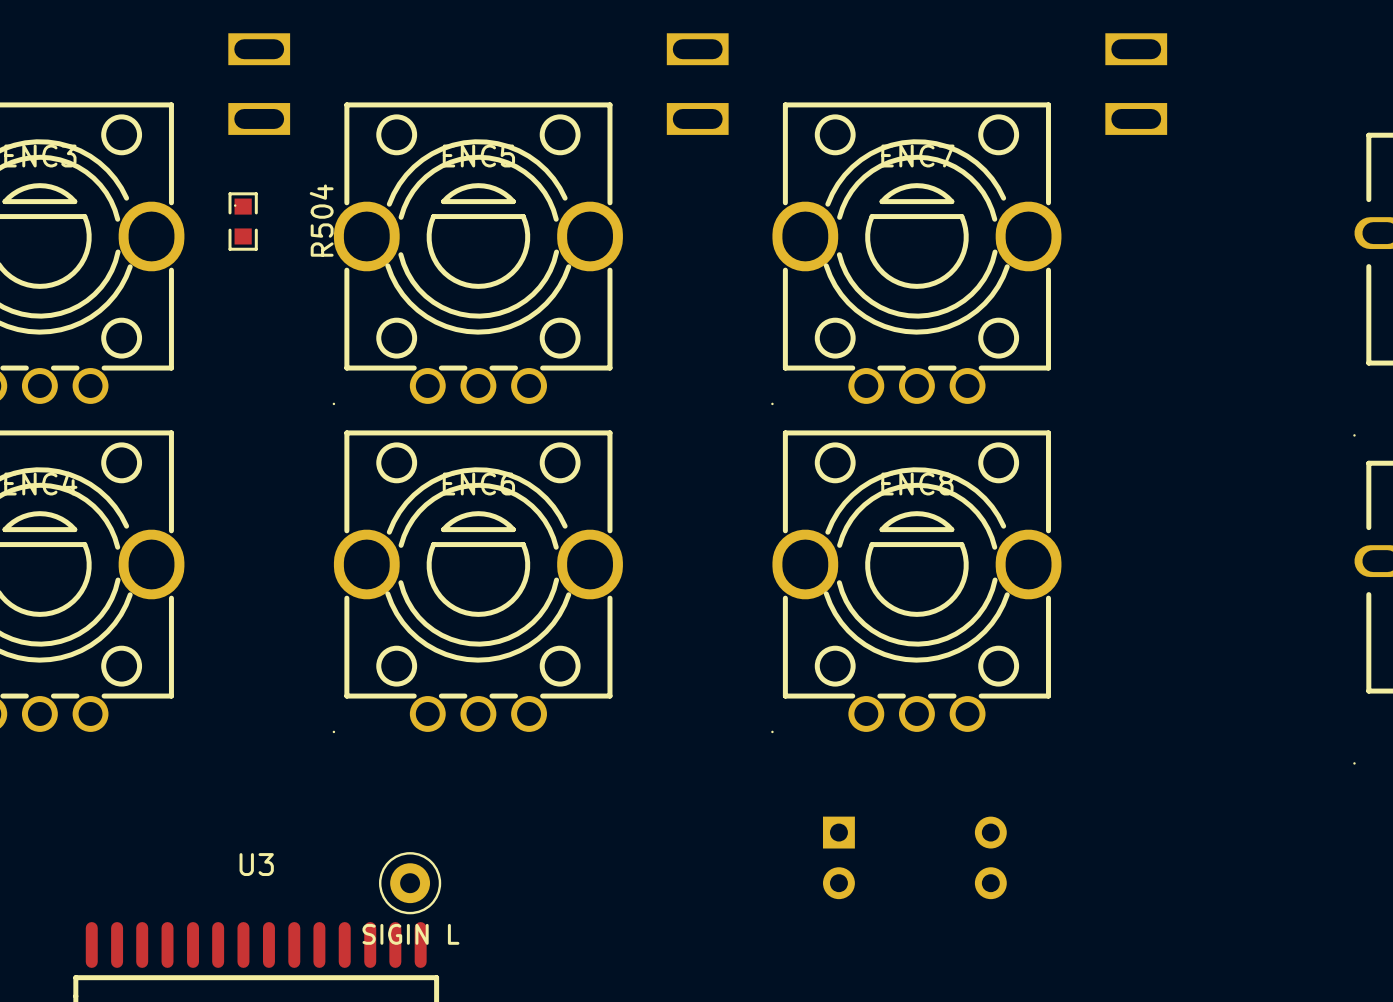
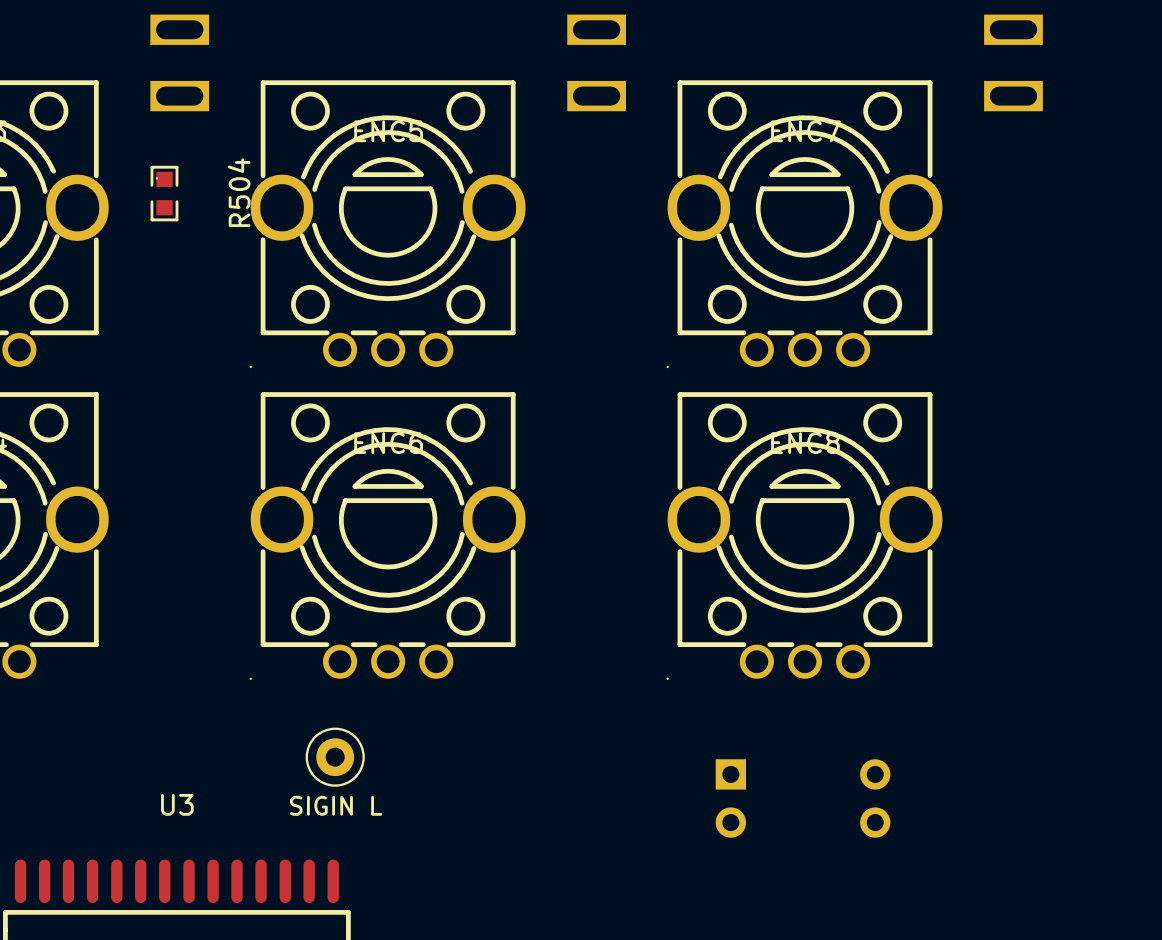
part position: (410, 883) -> (335, 757)

